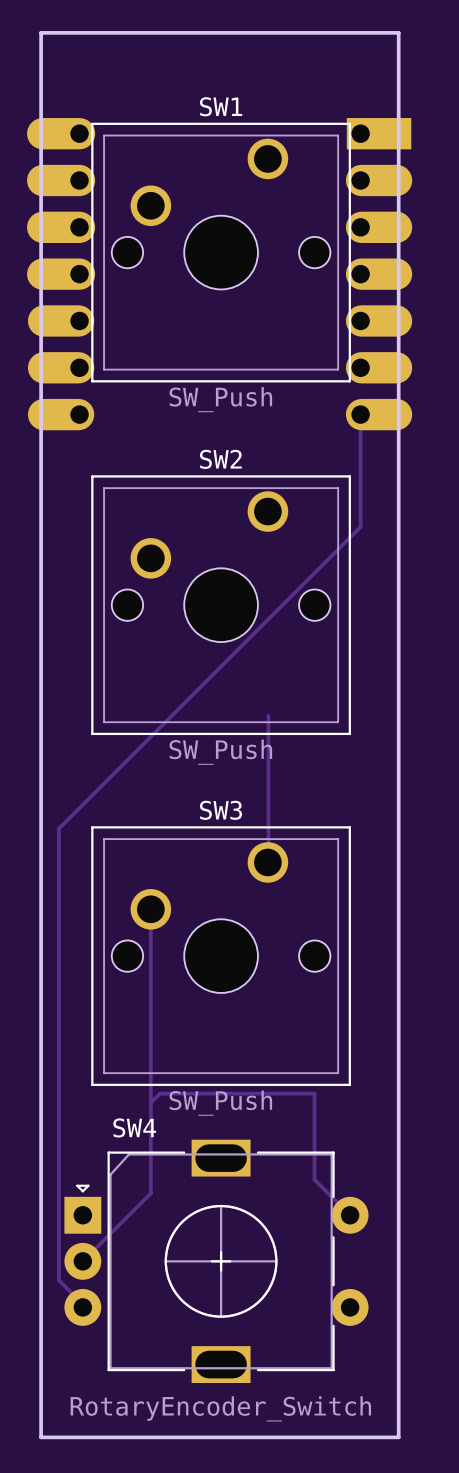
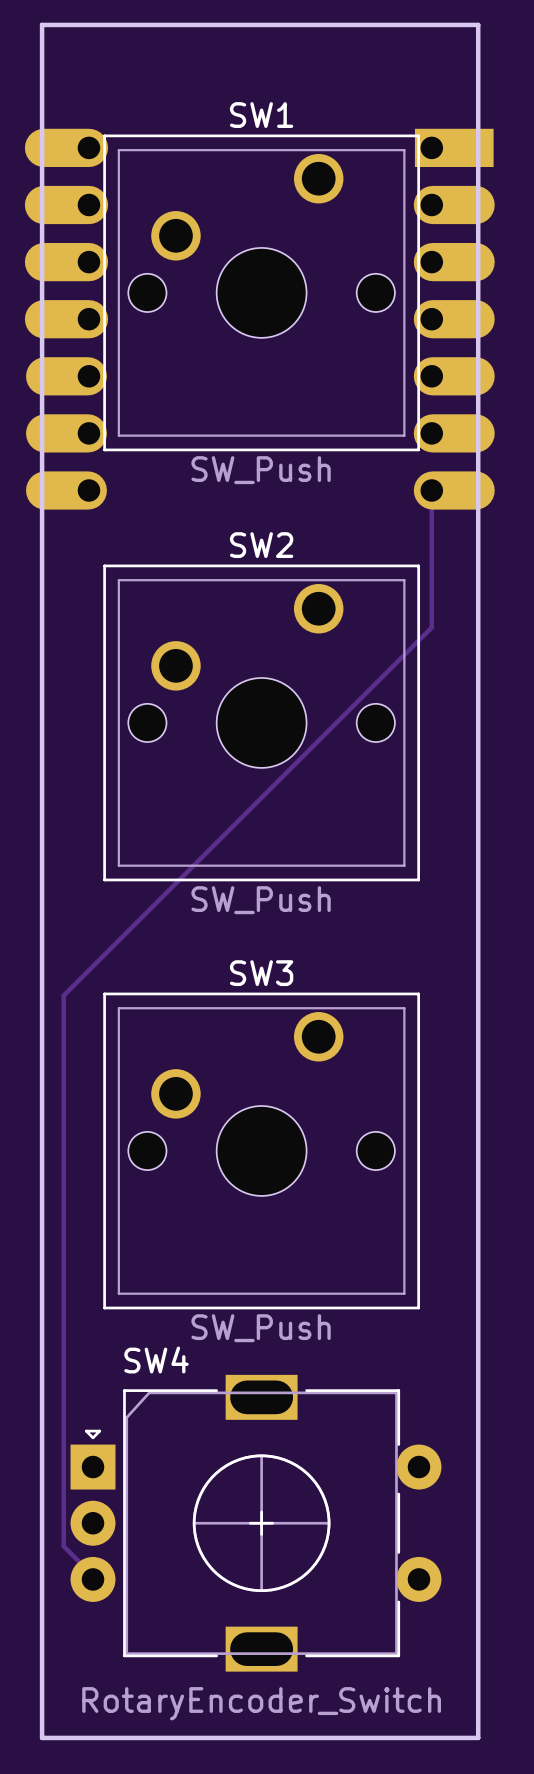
track: (268, 715) (268, 854) -> none
track: (150, 909) (150, 1193) (82, 1261) -> none
track: (150, 1102) (160, 1093) (314, 1093) (314, 1179) (350, 1215) -> none

